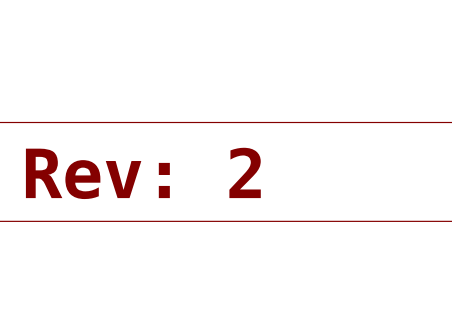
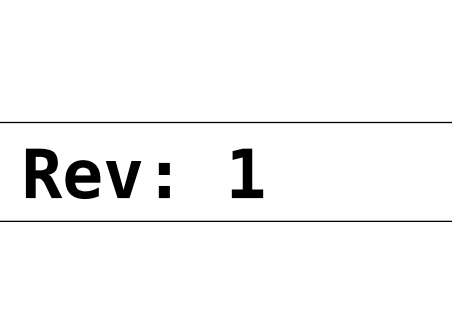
title block: Rev: 2 (143, 173) -> Rev: 1 (144, 173)

